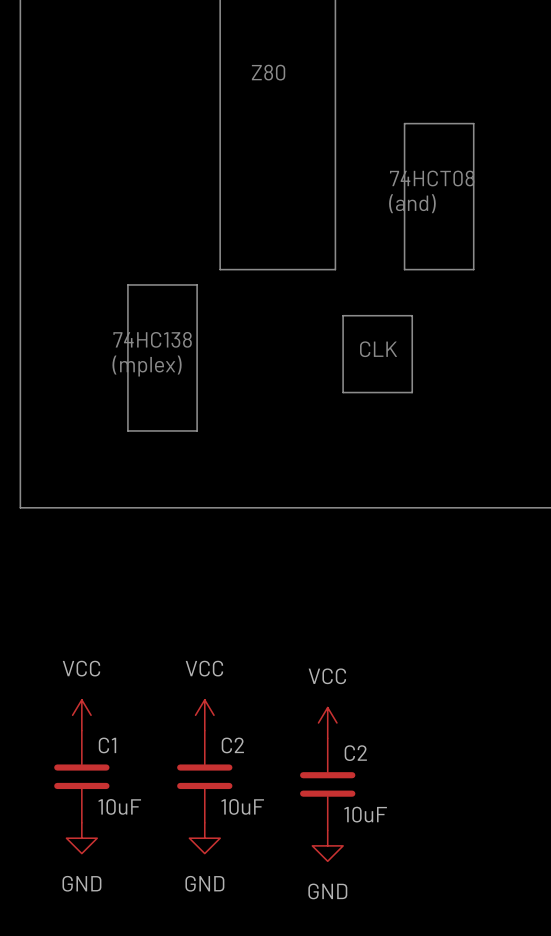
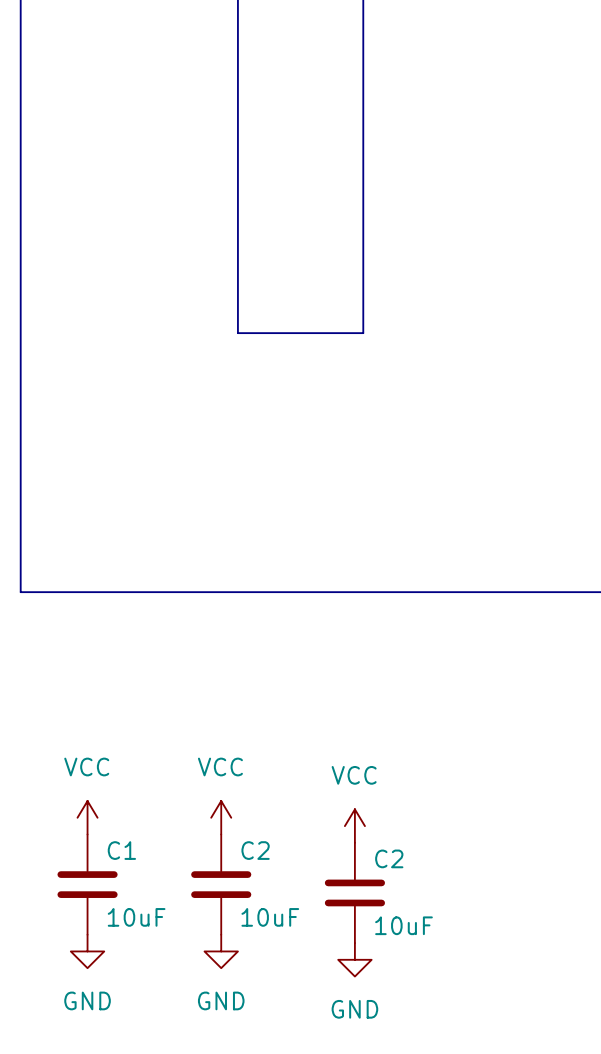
text: Z80 (268, 72) -> none
line: (404, 123) (473, 123) (473, 269) (404, 269) (404, 123) -> none
text: 74HCT08 (432, 178) -> none
text: (and) (412, 203) -> none
line: (127, 284) (197, 284) (197, 430) (127, 430) (127, 284) -> none
line: (343, 315) (412, 315) (412, 392) (343, 392) (343, 315) -> none
text: 74HC138 (152, 339) -> none
text: CLK (378, 349) -> none
text: (mplex) (147, 366) -> none

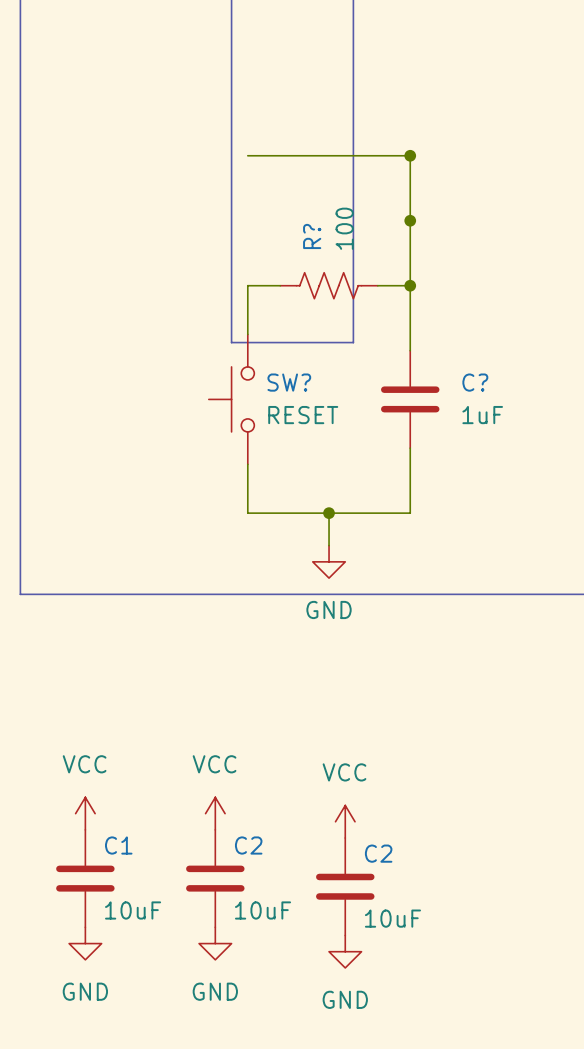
wire: none -> (247, 155) (410, 155) (410, 350)
junction: none -> (410, 155)
junction: none -> (410, 220)
wire: none -> (280, 285) (247, 285) (247, 334)
R?: none -> 100 (329, 285)
wire: none -> (377, 285) (410, 285)
junction: none -> (410, 285)
SW?: none -> RESET (231, 399)
C?: none -> 1uF (410, 399)
wire: none -> (410, 448) (410, 513) (247, 513) (247, 464)
wire: none -> (329, 513) (329, 545)
junction: none -> (329, 513)
power symbol: none -> GND (329, 561)

